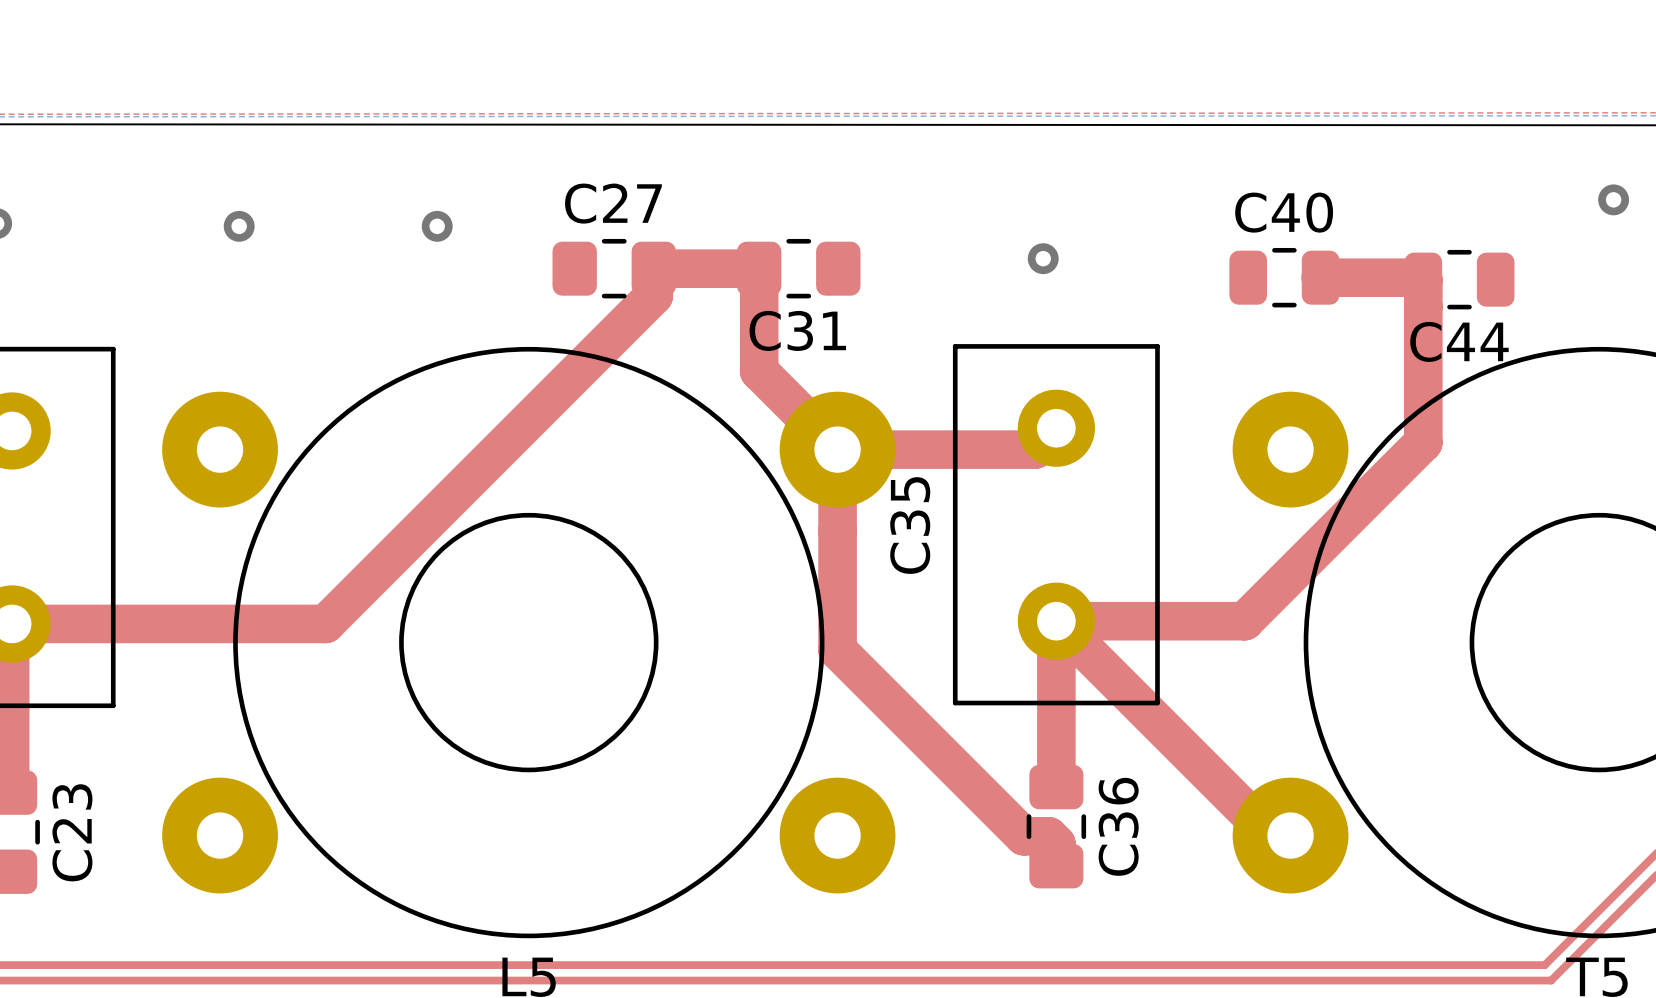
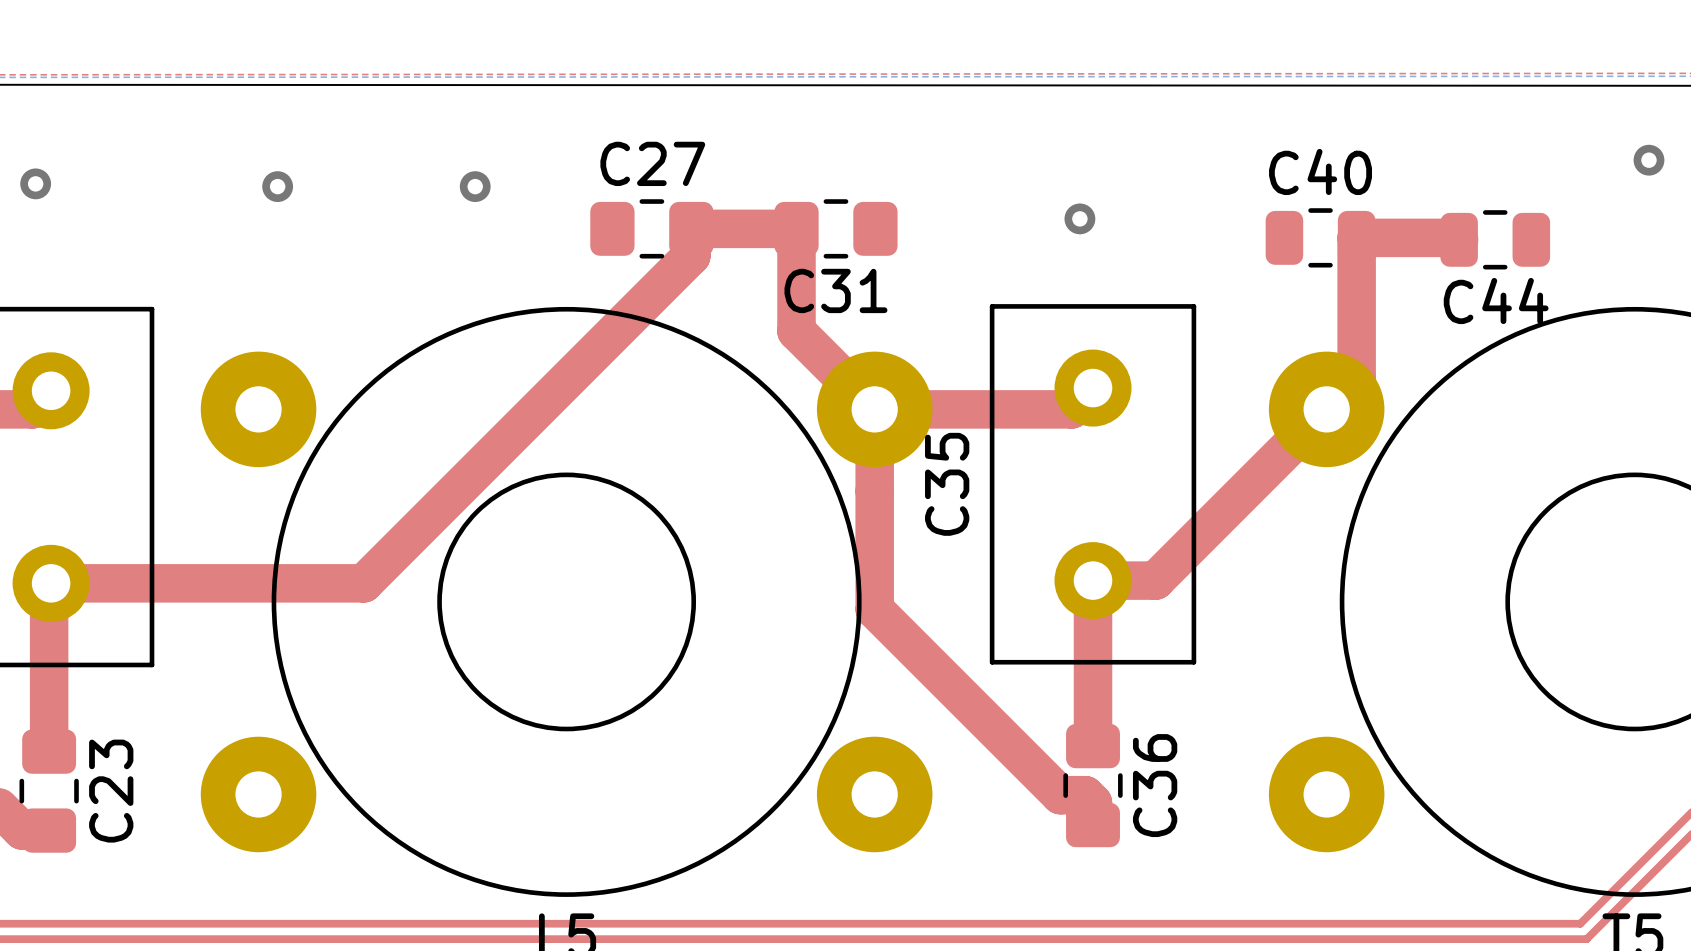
top track: (1423, 279) (1423, 442) (1244, 621) (1118, 621) -> (1356, 237) (1356, 379) (1155, 580)
top track: (1056, 621) (1270, 835) (1290, 835) -> none

